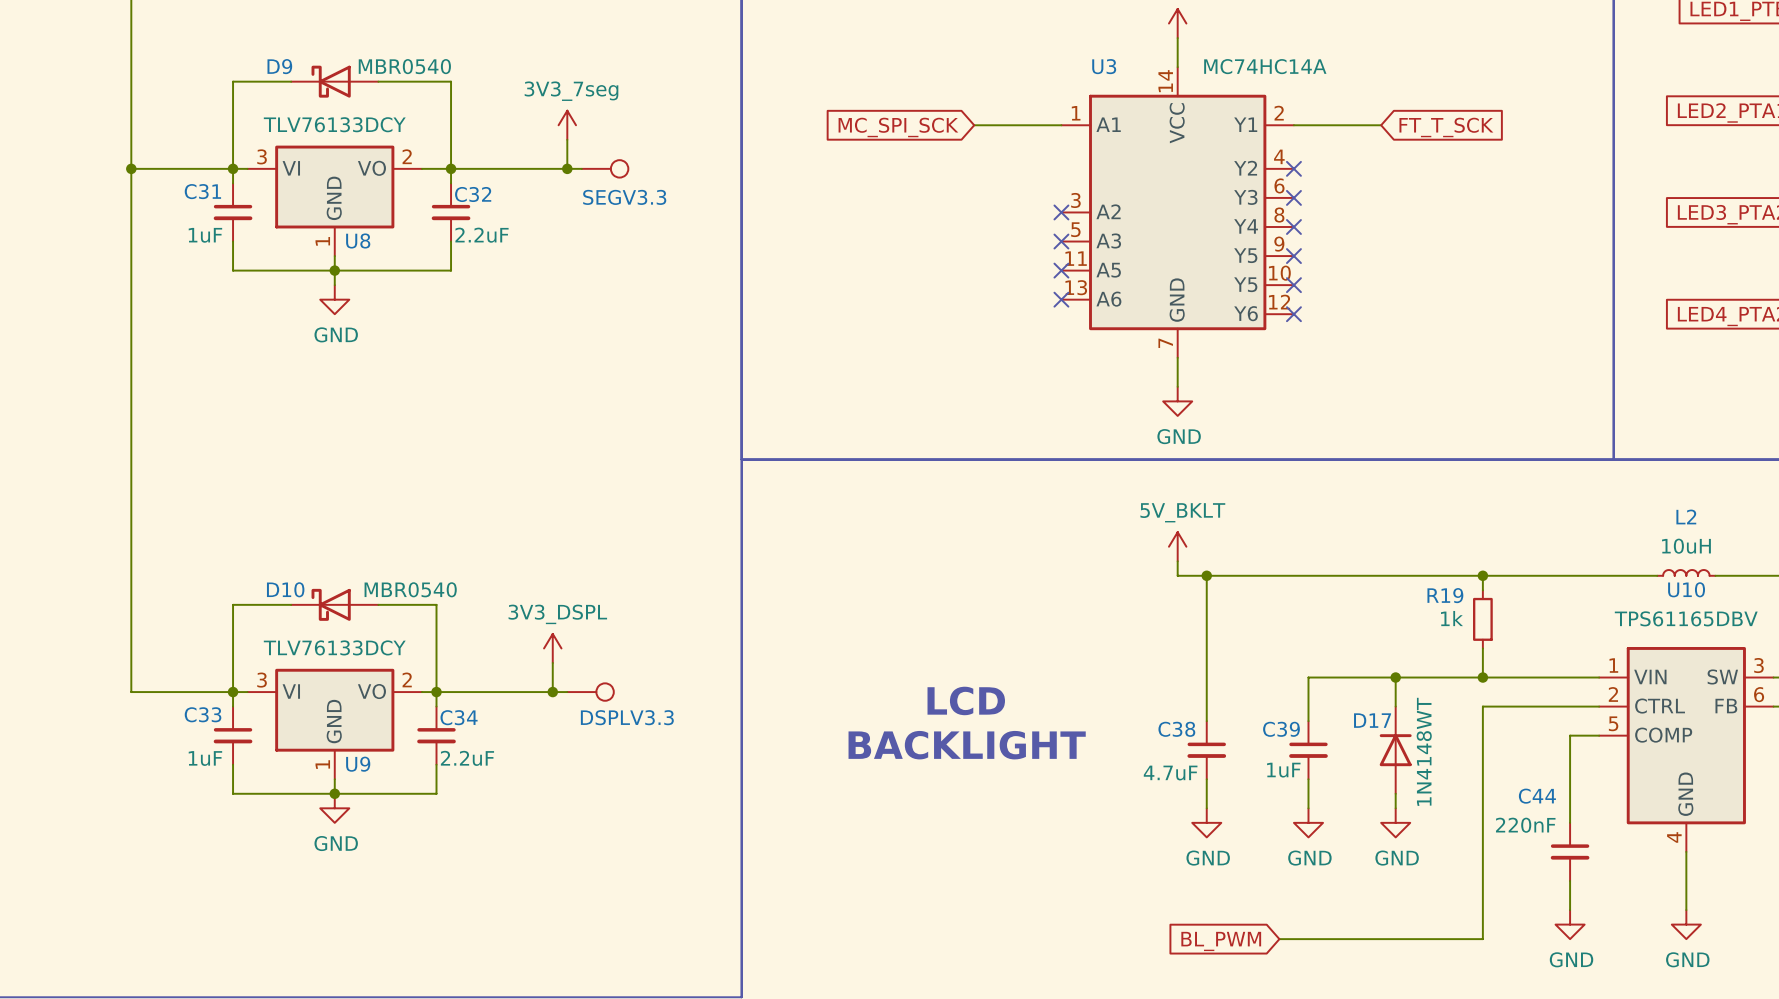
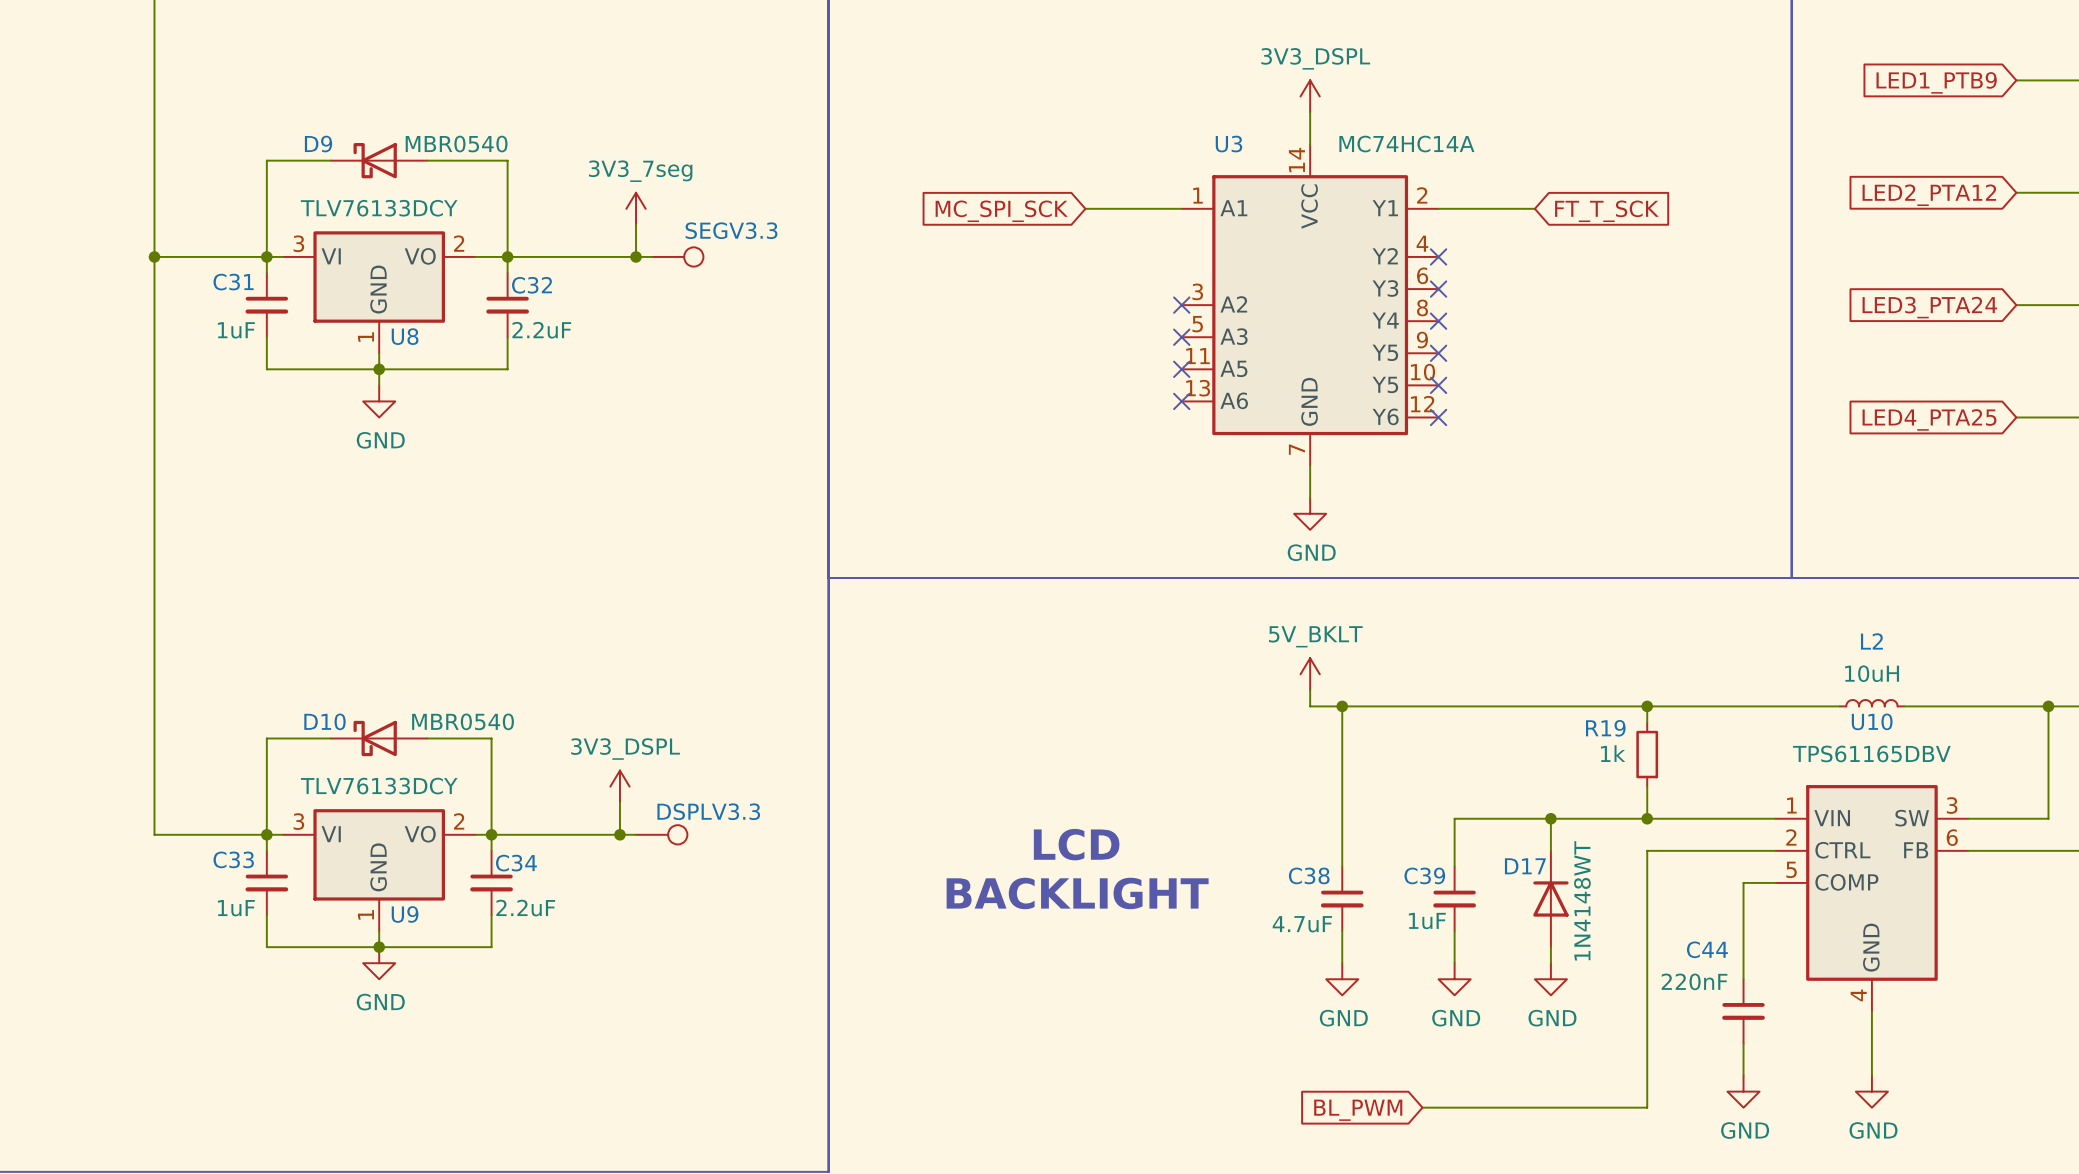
SEGV3.3 name position: SEGV3.3 (624, 197) -> SEGV3.3 (731, 230)
DSPLV3.3 name position: DSPLV3.3 (627, 717) -> DSPLV3.3 (708, 811)

